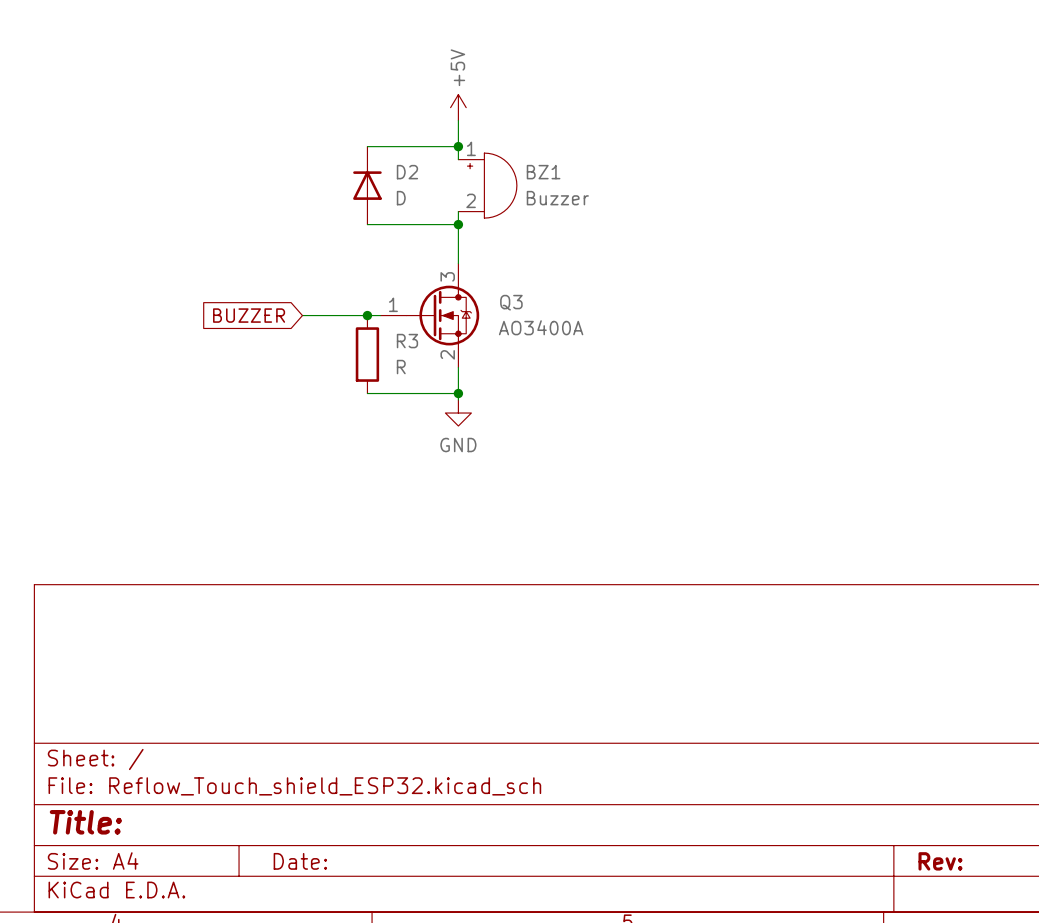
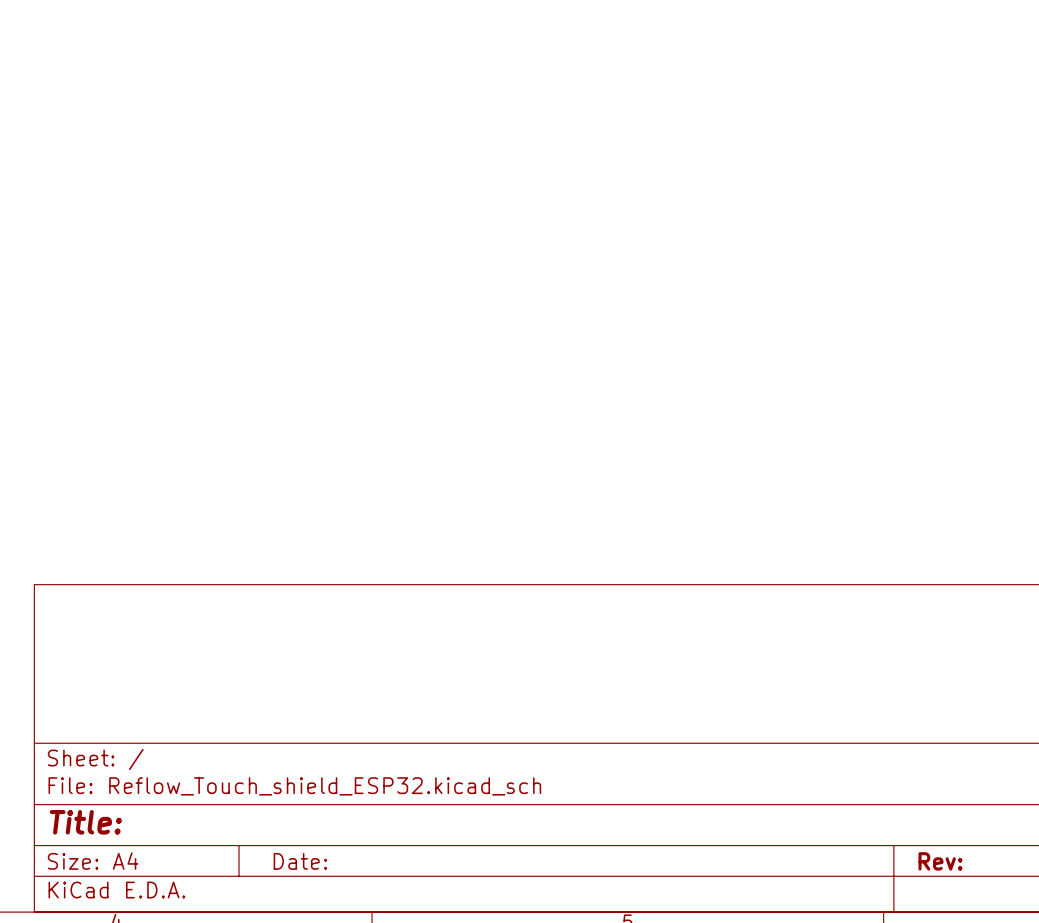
power symbol: +5V (458, 107) -> none
wire: (458, 120) (458, 159) -> none
wire: (367, 146) (458, 146) -> none
junction: (458, 146) -> none
D2: D (367, 185) -> none
BZ1: Buzzer (487, 185) -> none
wire: (458, 211) (458, 263) -> none
wire: (367, 224) (458, 224) -> none
junction: (458, 224) -> none
global label: BUZZER (249, 315) -> none
wire: (302, 315) (380, 315) -> none
junction: (367, 315) -> none
Q3: AO3400A (429, 315) -> none
R3: R (367, 354) -> none
wire: (458, 367) (458, 400) -> none
wire: (367, 393) (458, 393) -> none
junction: (458, 393) -> none
power symbol: GND (458, 413) -> none

